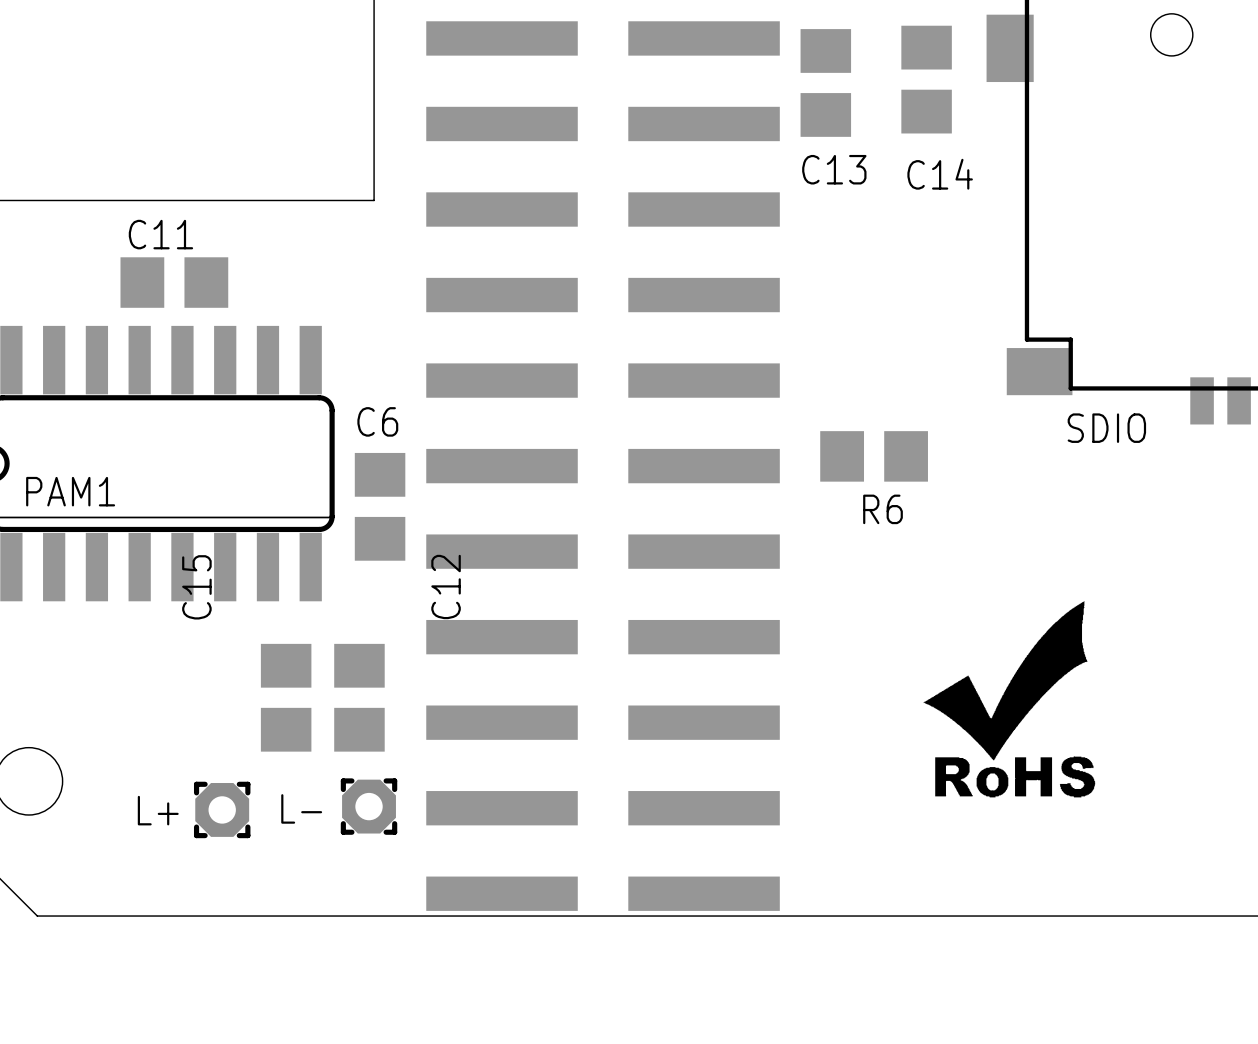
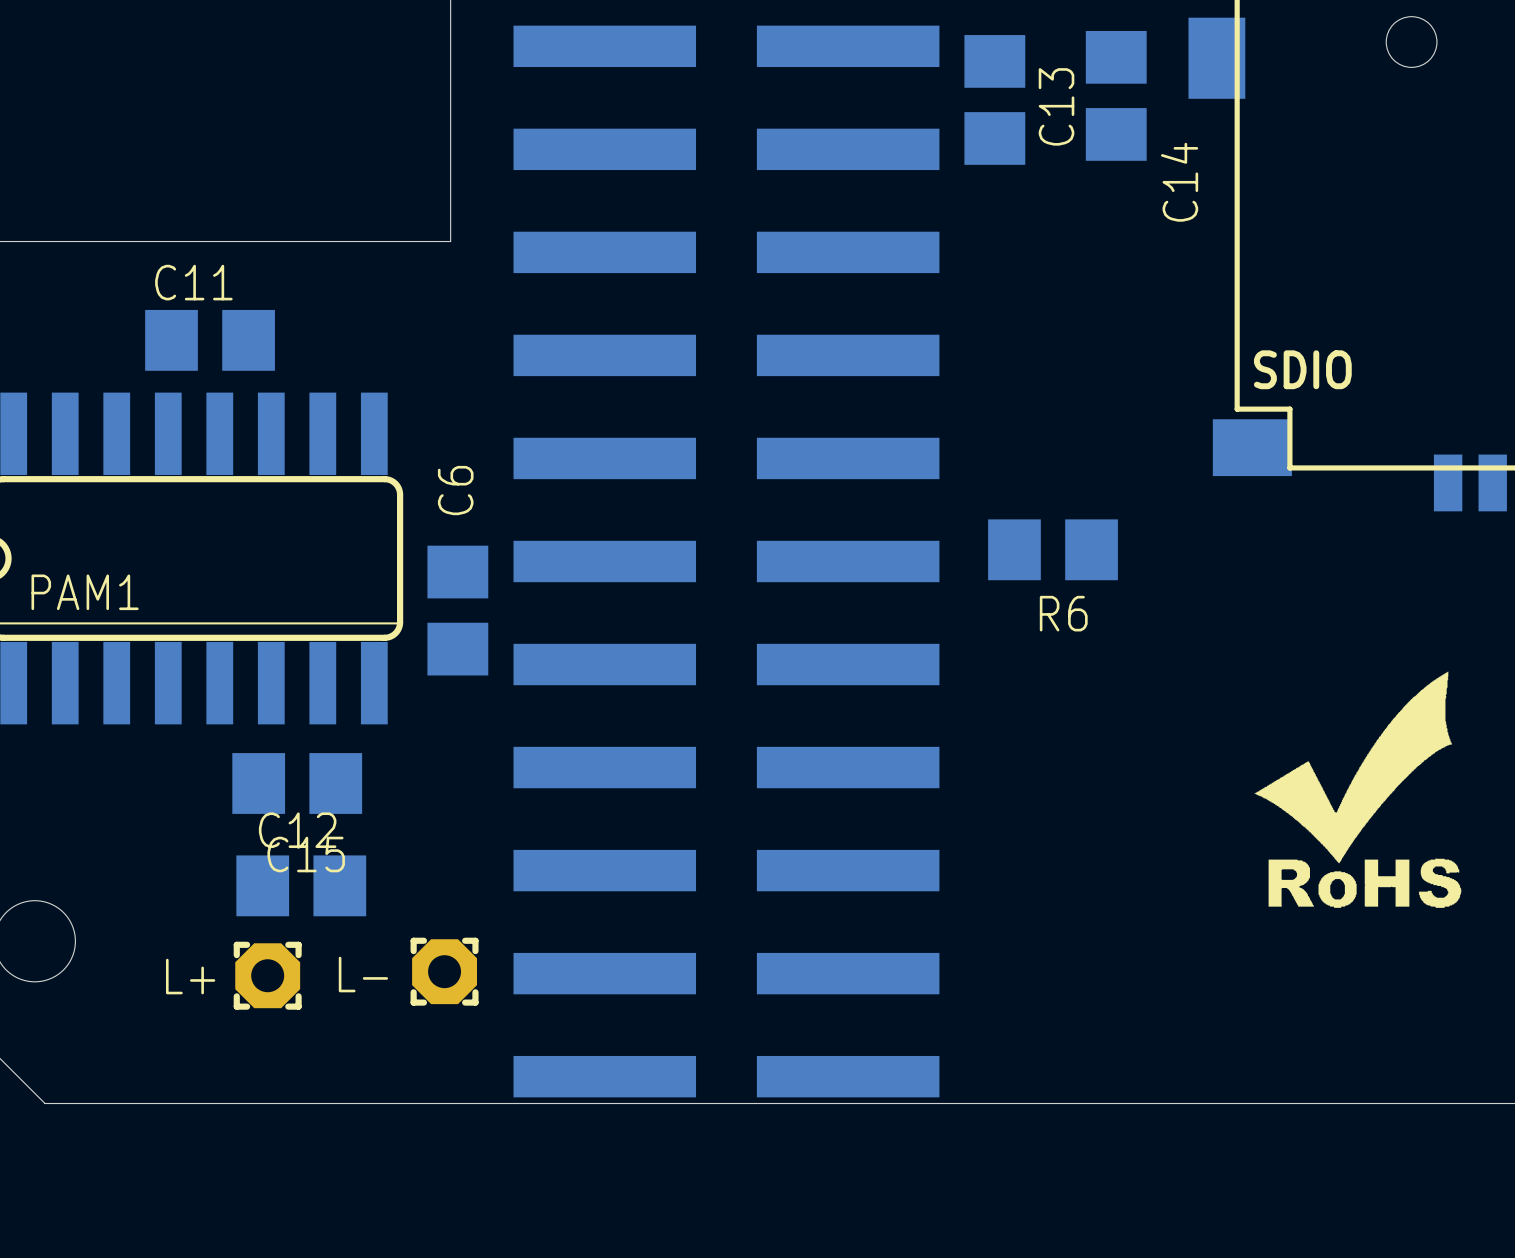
C13 name rotation: 0° (834, 169) -> 90° counterclockwise (1056, 106)
C13 name position: C13 (834, 169) -> C13 (1056, 106)
C14 name rotation: 0° (940, 174) -> 90° counterclockwise (1179, 182)
C6 name rotation: 0° (377, 421) -> 90° counterclockwise (455, 490)
SDIO name position: SDIO (1106, 428) -> SDIO (1302, 369)
C15 name position: C15 (196, 587) -> C15 (306, 854)
C12 name position: C12 (446, 587) -> C12 (297, 830)
C15 rotation: 0° (286, 697) -> 90° clockwise (297, 783)
C12 rotation: 0° (359, 697) -> 90° clockwise (301, 885)
C12 position: (359, 697) -> (301, 885)
drawing position: (1009, 699) -> (1357, 789)

